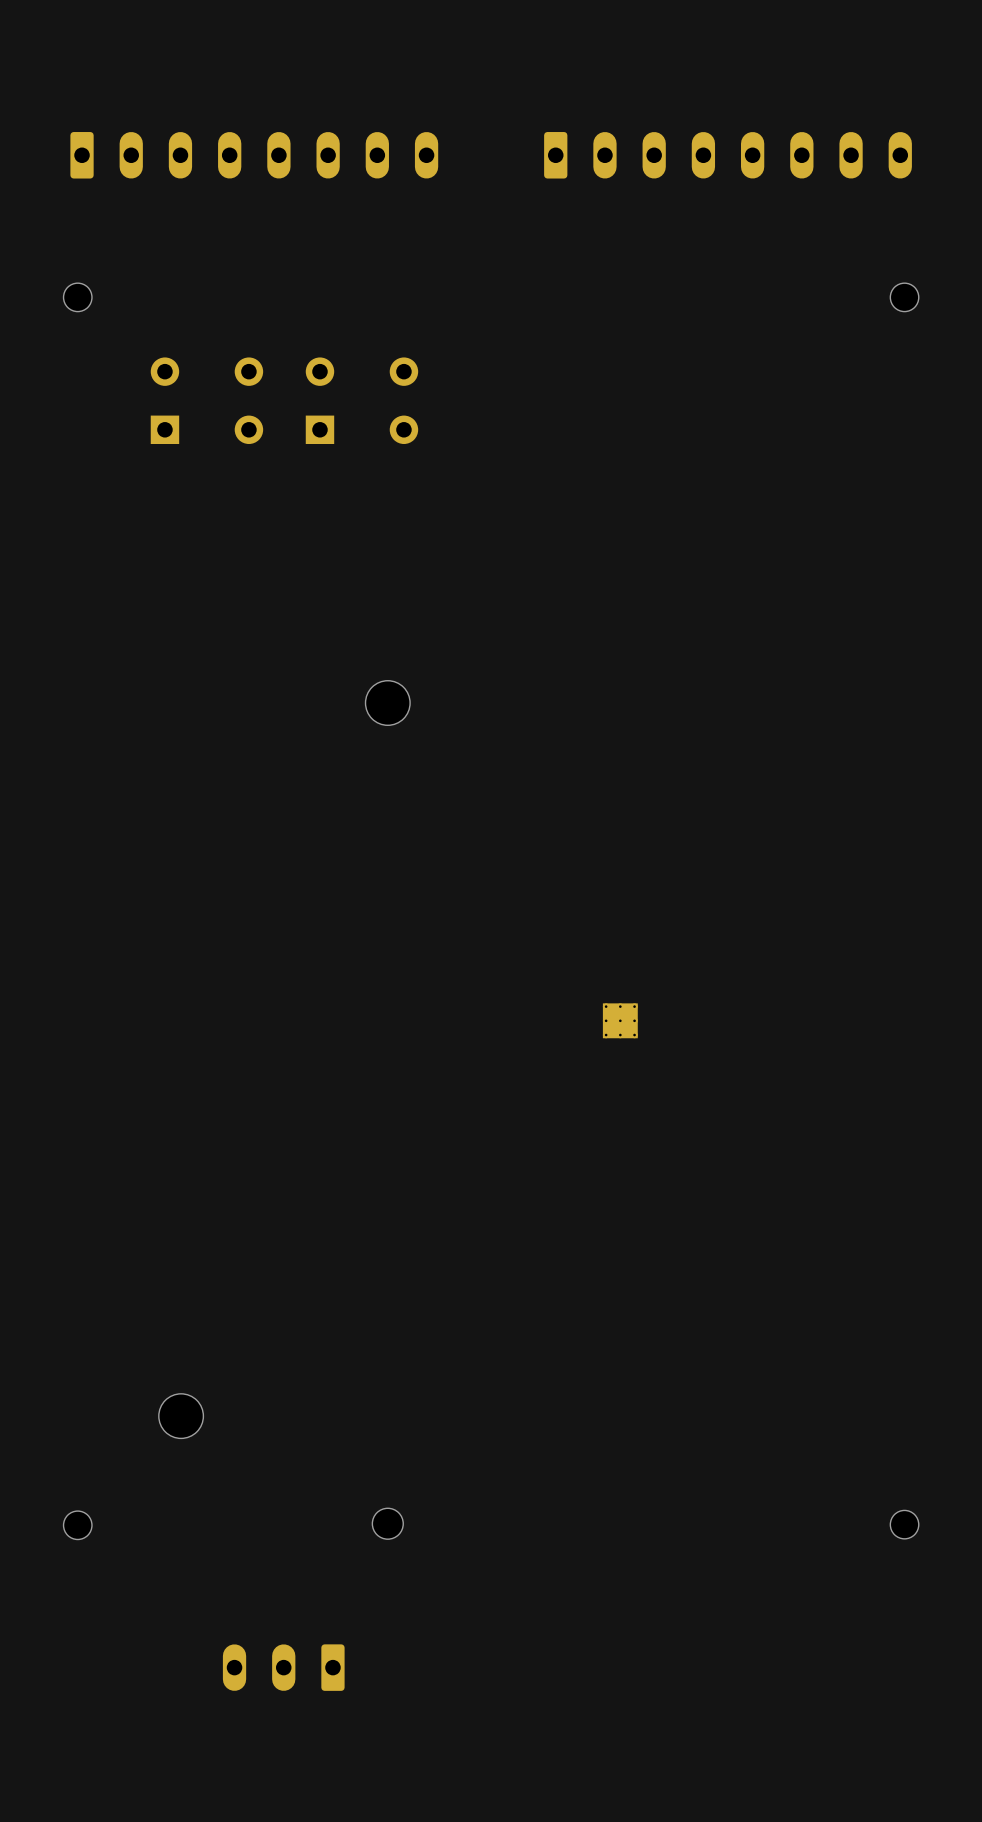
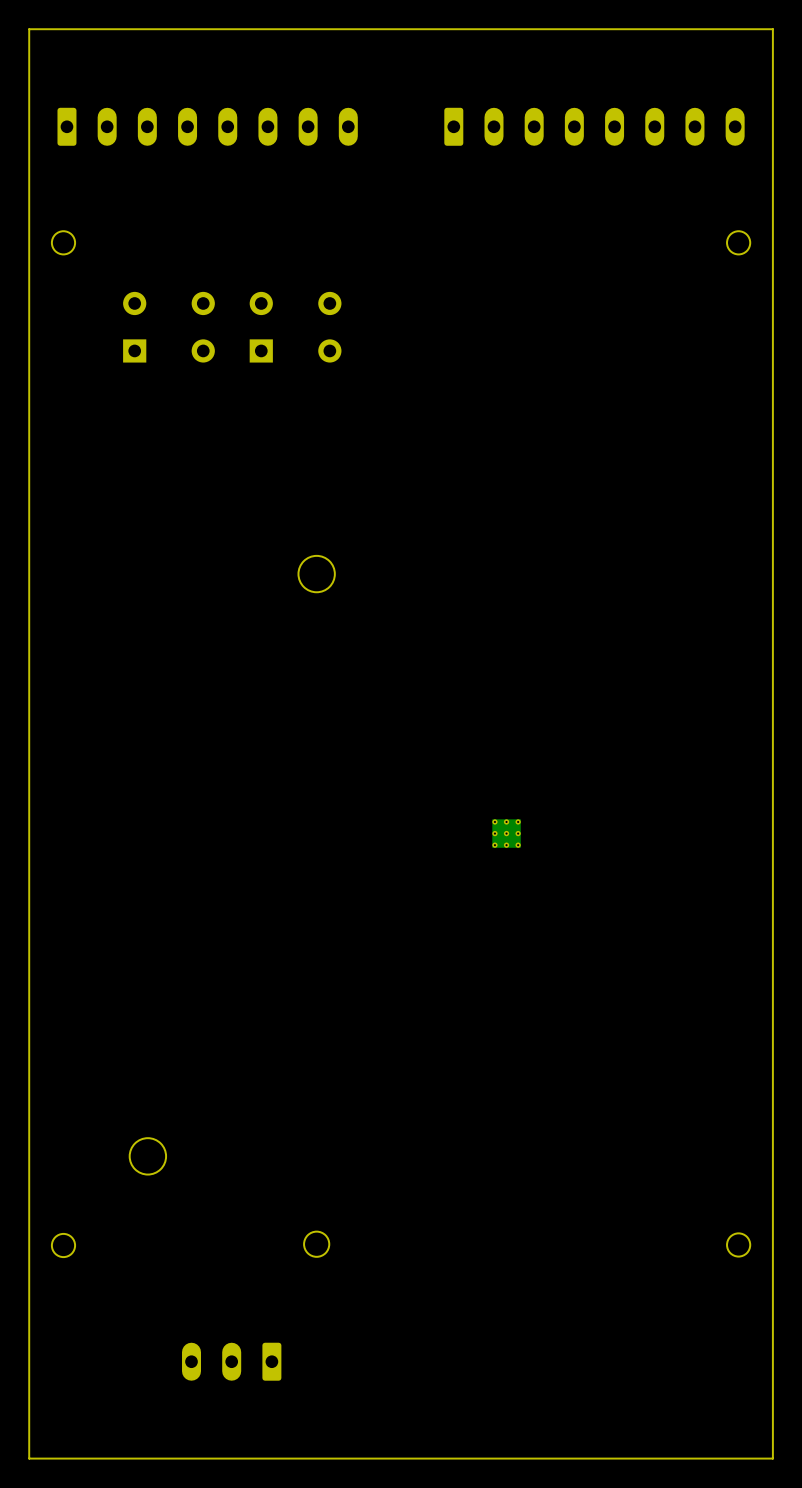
board edge: none -> (772, 29) (29, 29) (29, 1458) (772, 1458) (772, 29)

